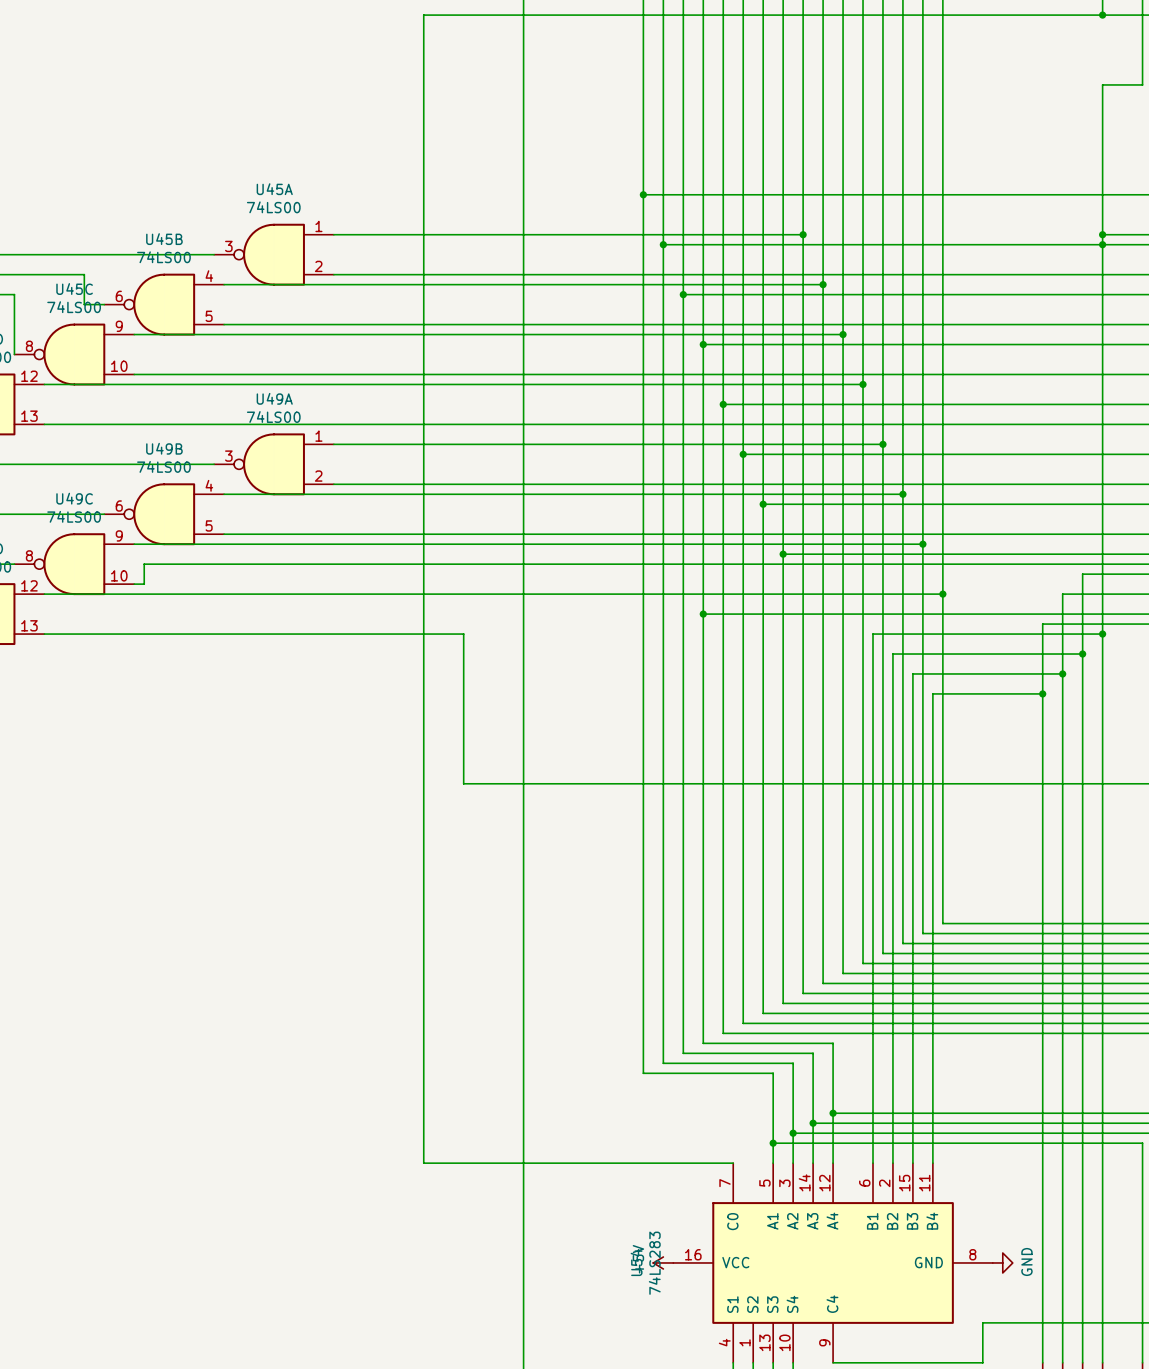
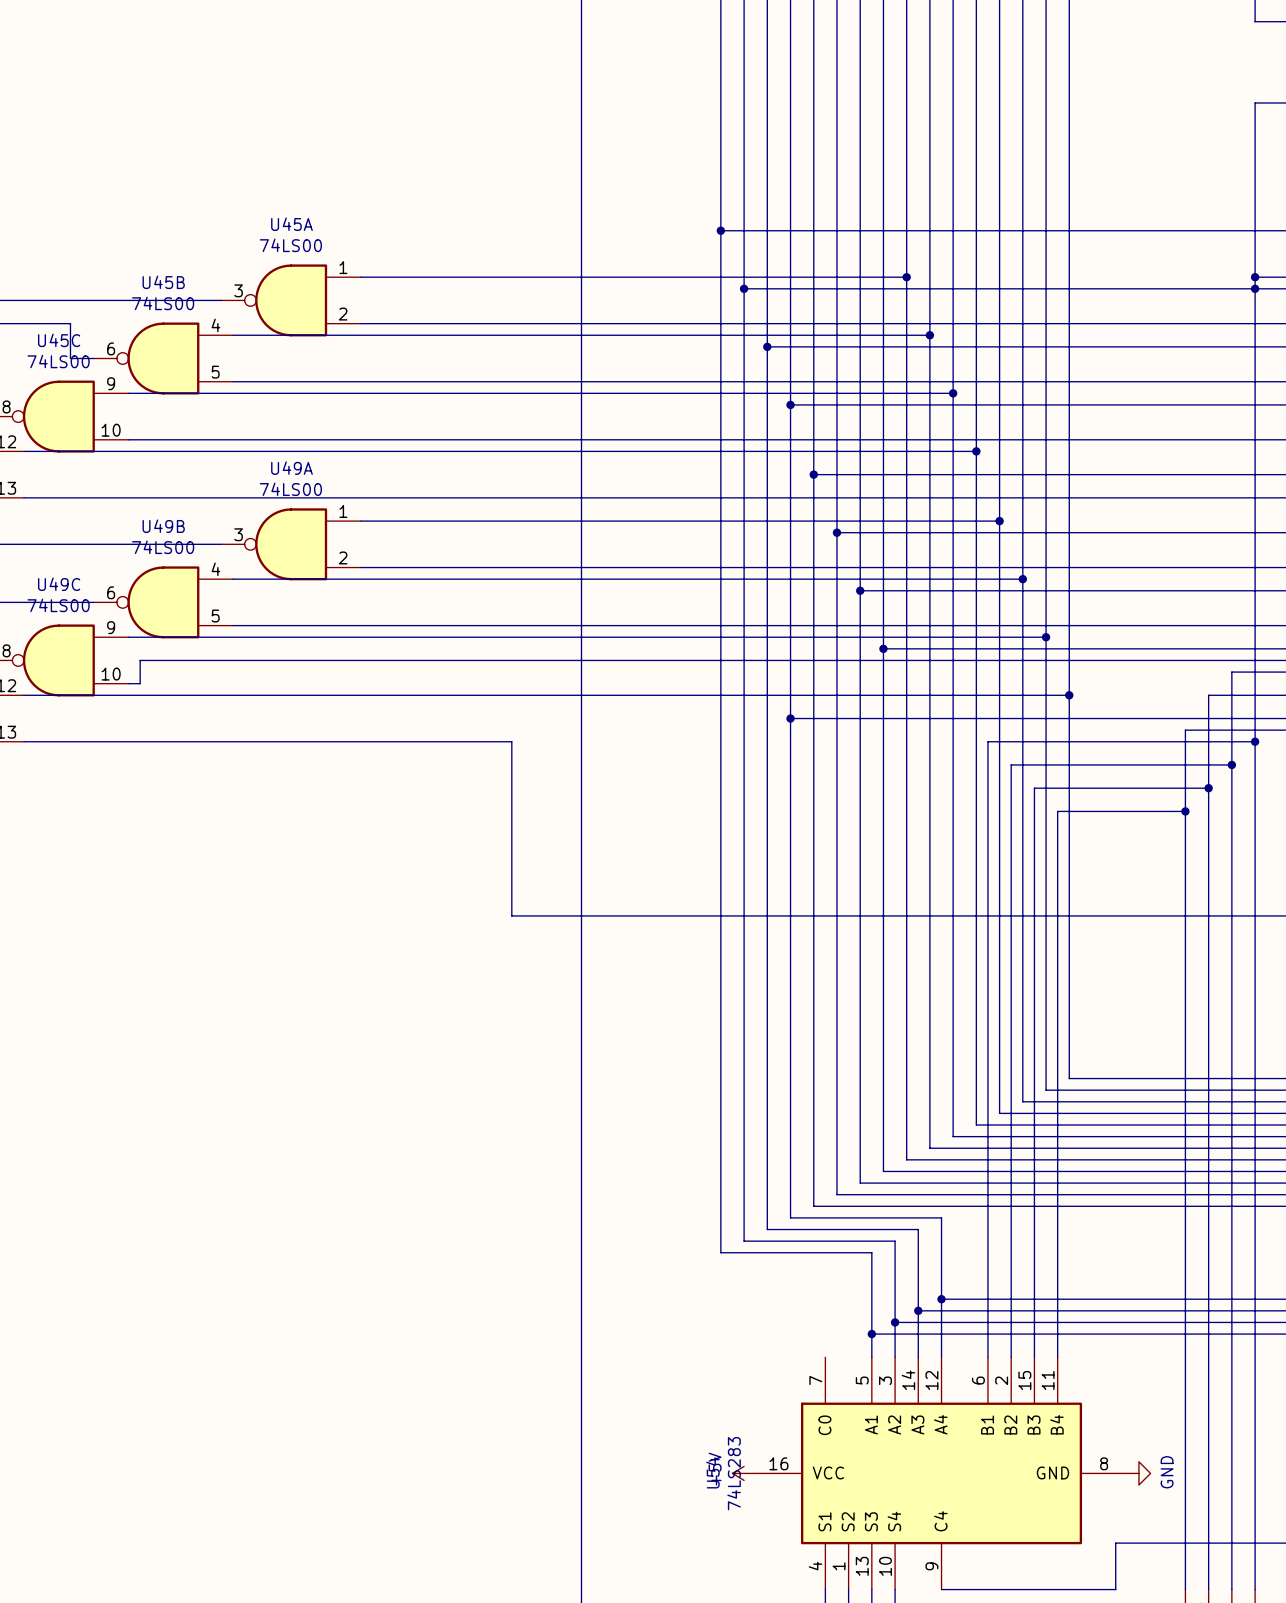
wire: (1102, 15) (423, 15) (423, 1163) (733, 1163) -> none
junction: (1102, 15) -> none

